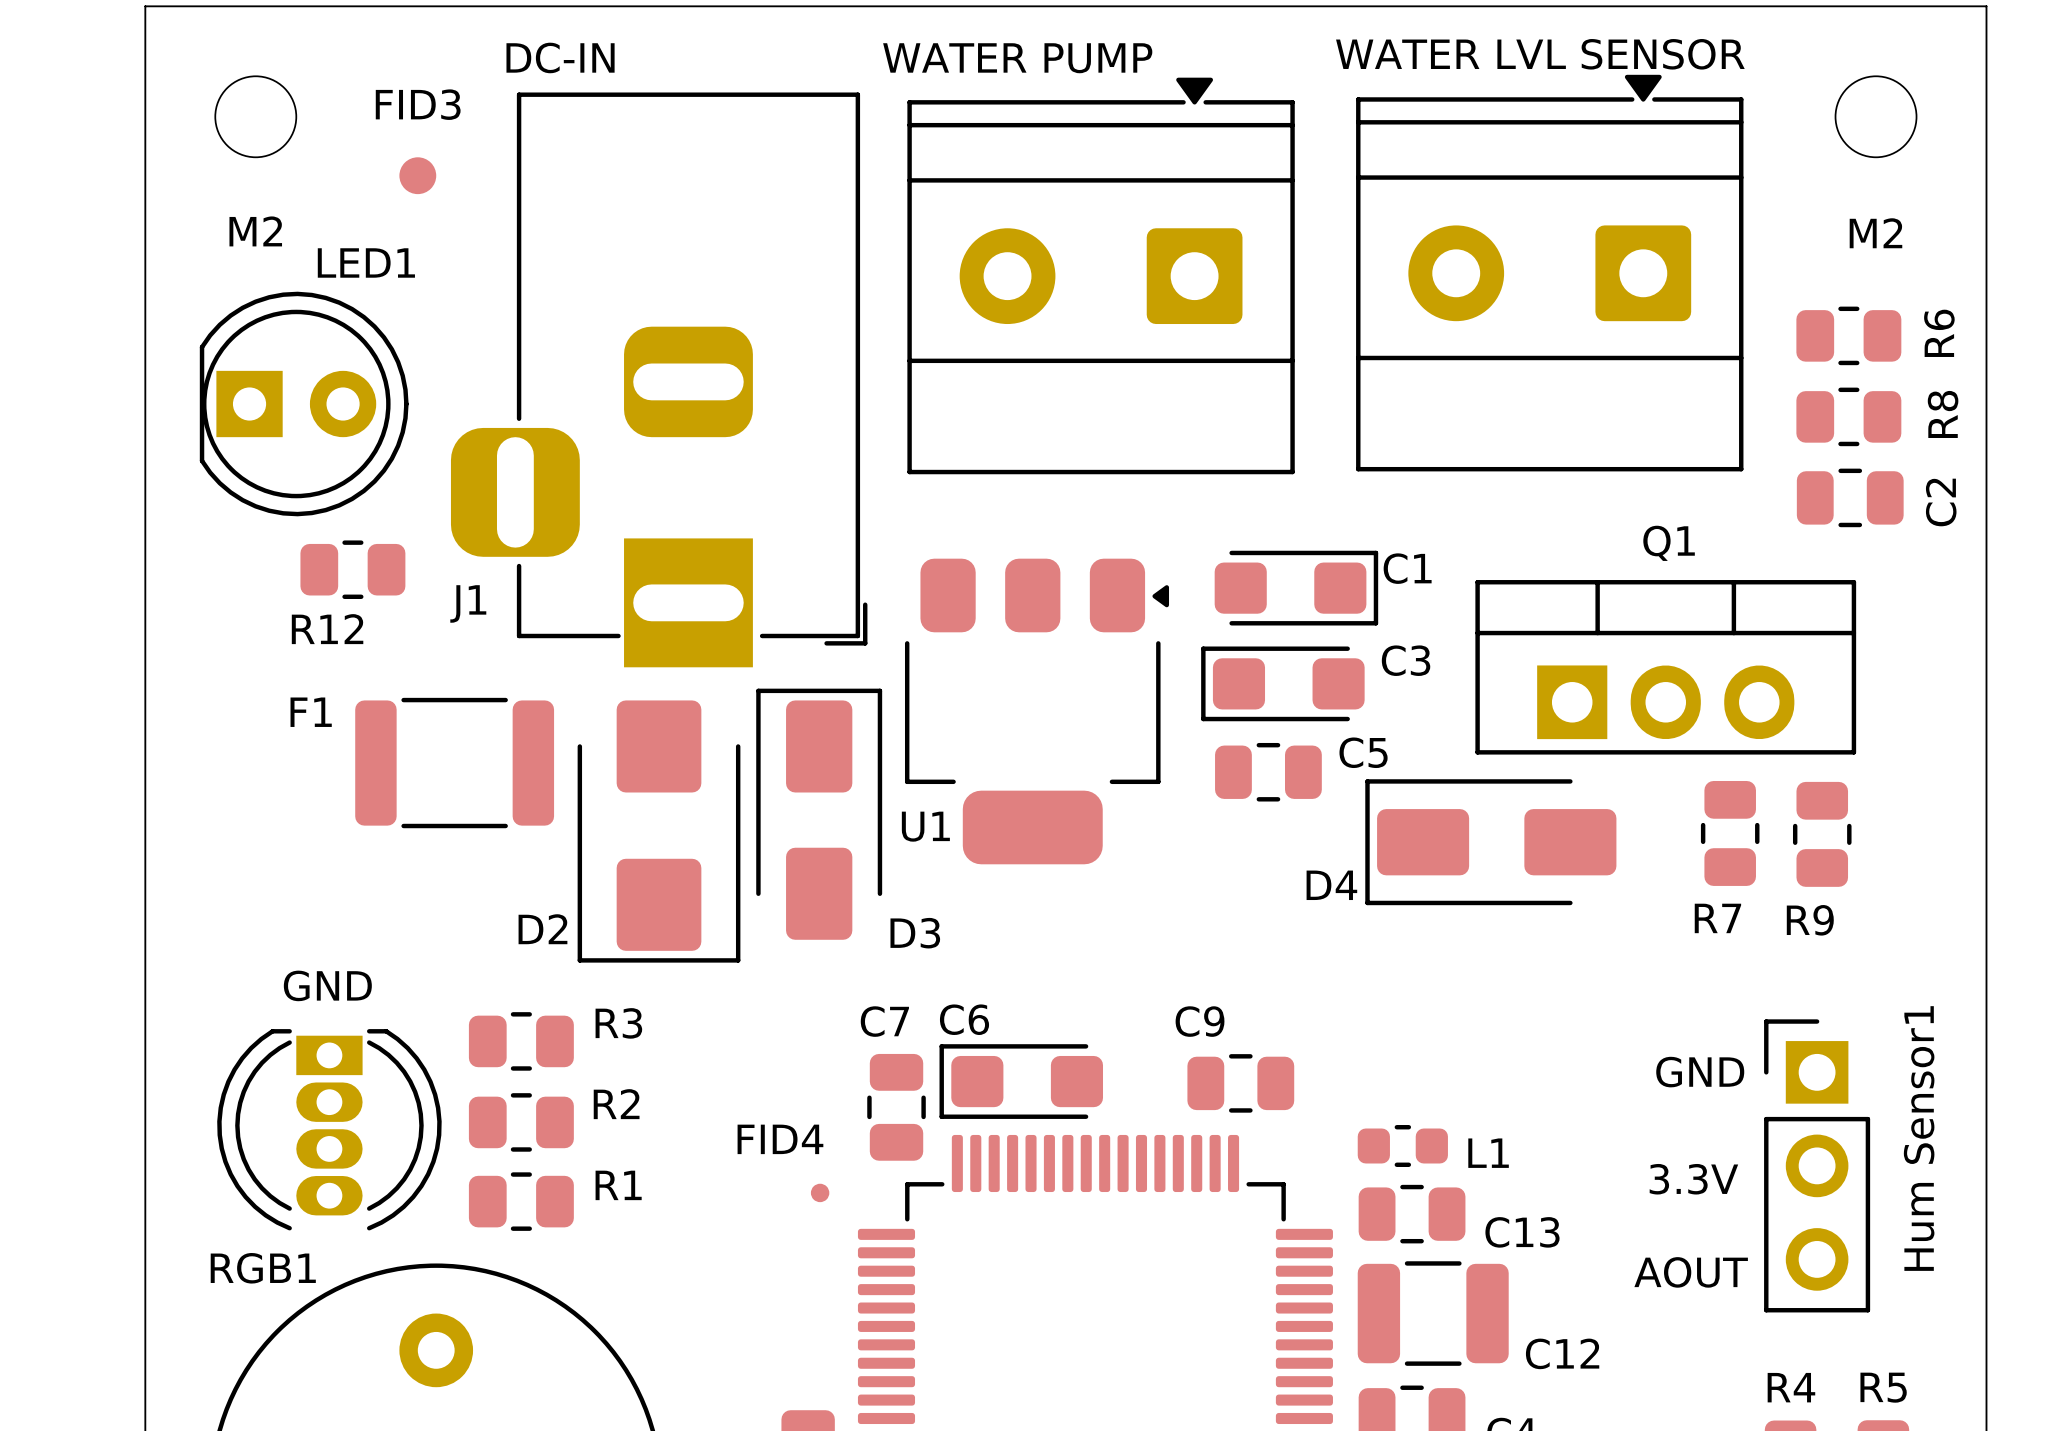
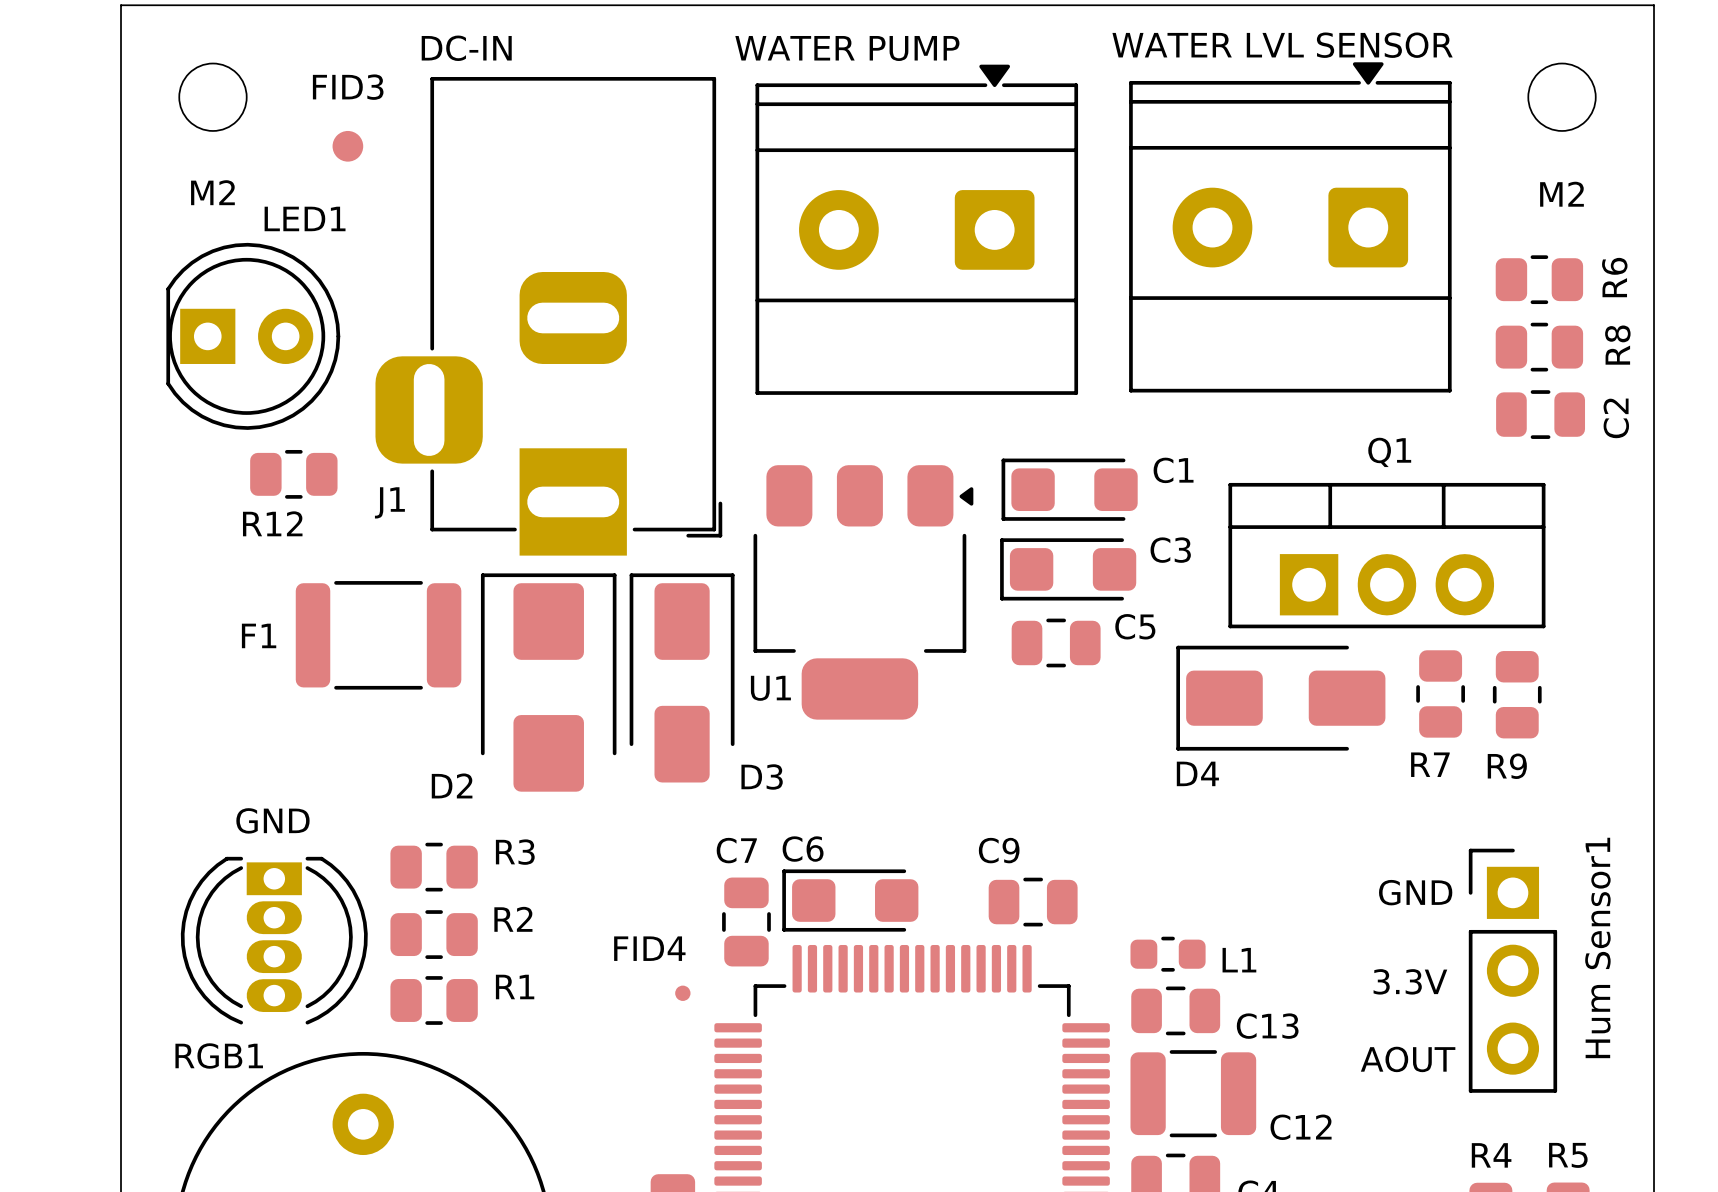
C1 rotation: 0° (1296, 588) -> 180° (1069, 489)
F1 name position: F1 (311, 712) -> F1 (259, 635)
D2 rotation: 0° (659, 831) -> 180° (548, 682)
D4 position: (1490, 842) -> (1280, 698)
D4 name position: D4 (1331, 885) -> D4 (1197, 773)

